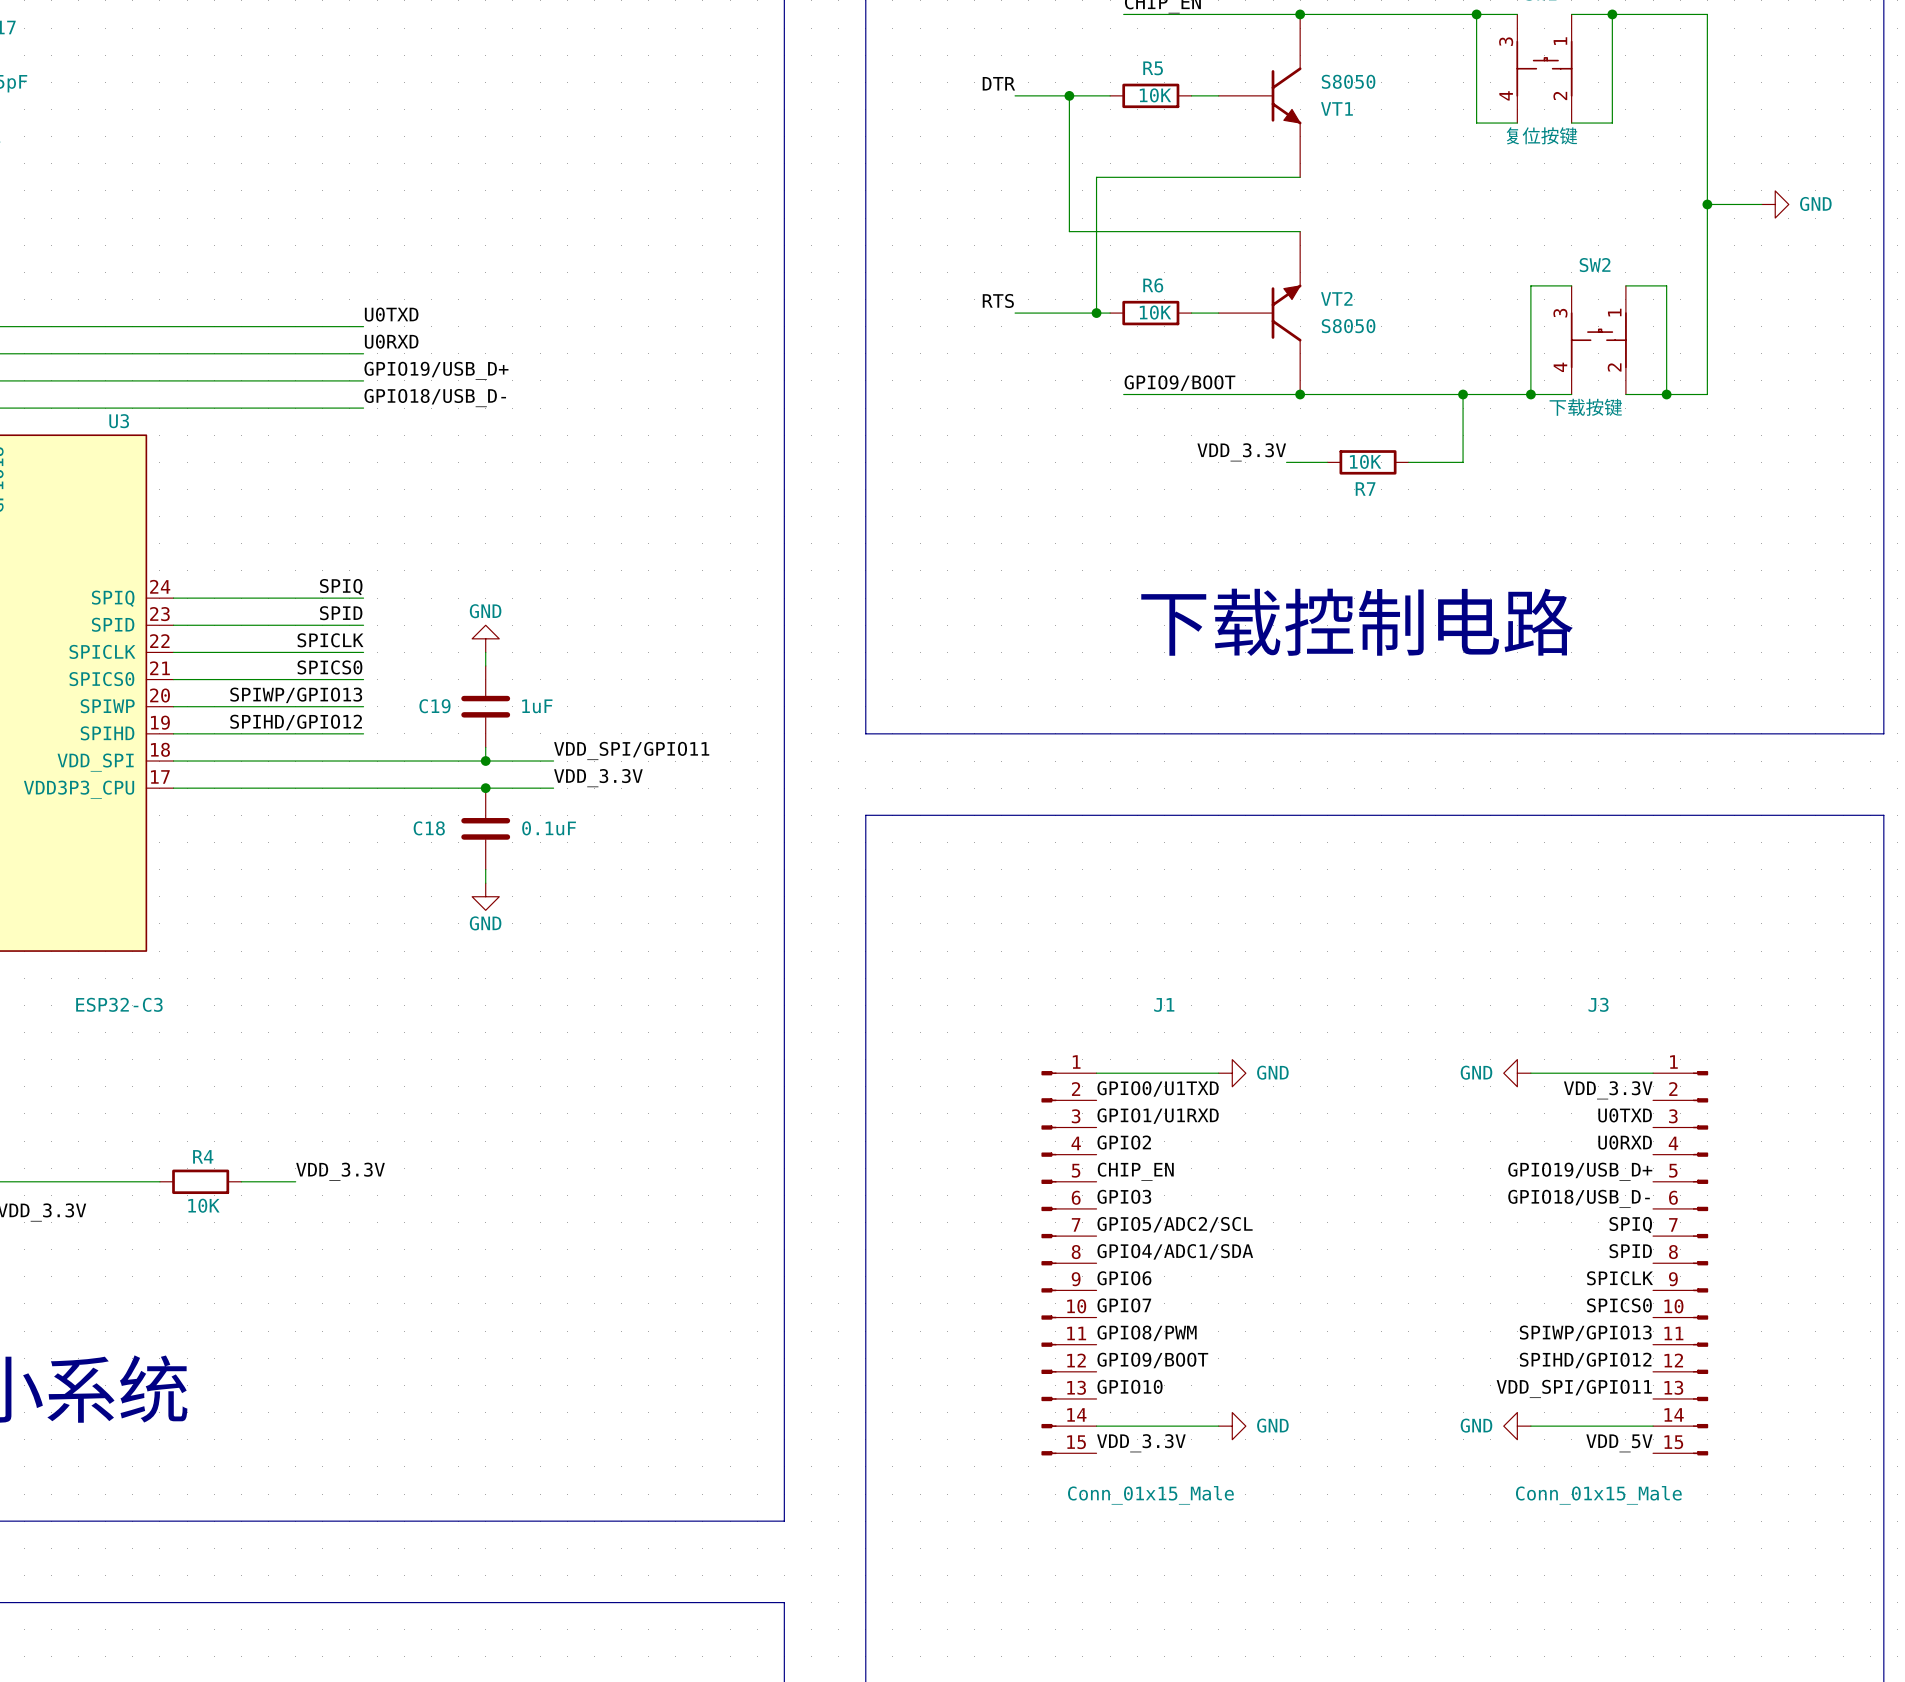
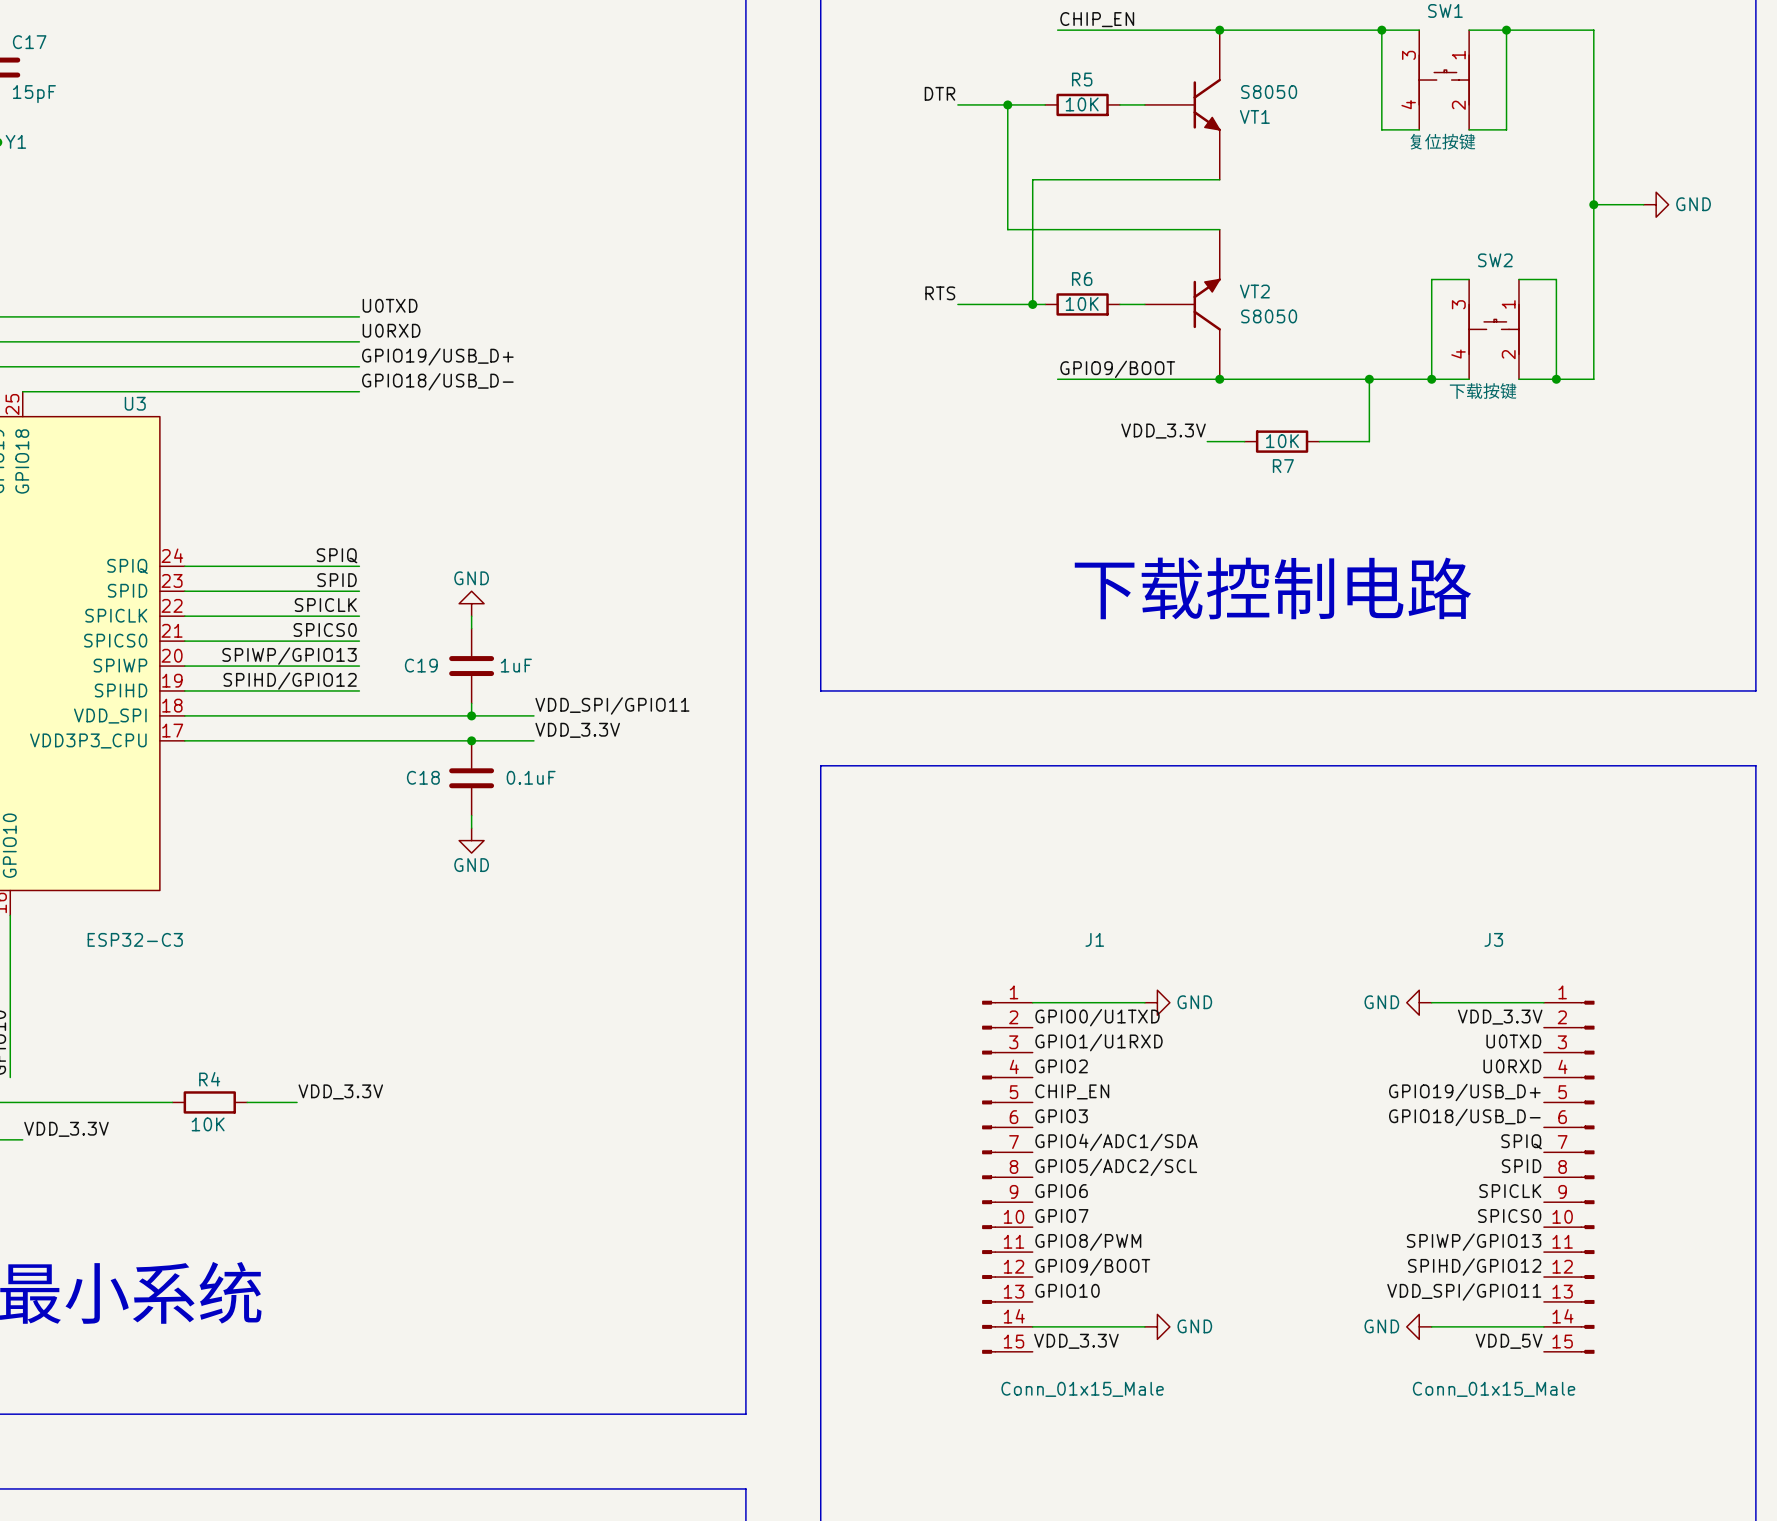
label: GPIO5/ADC2/SCL (1175, 1224) -> GPIO4/ADC1/SDA (1116, 1142)
label: GPIO4/ADC1/SDA (1175, 1251) -> GPIO5/ADC2/SCL (1116, 1167)

